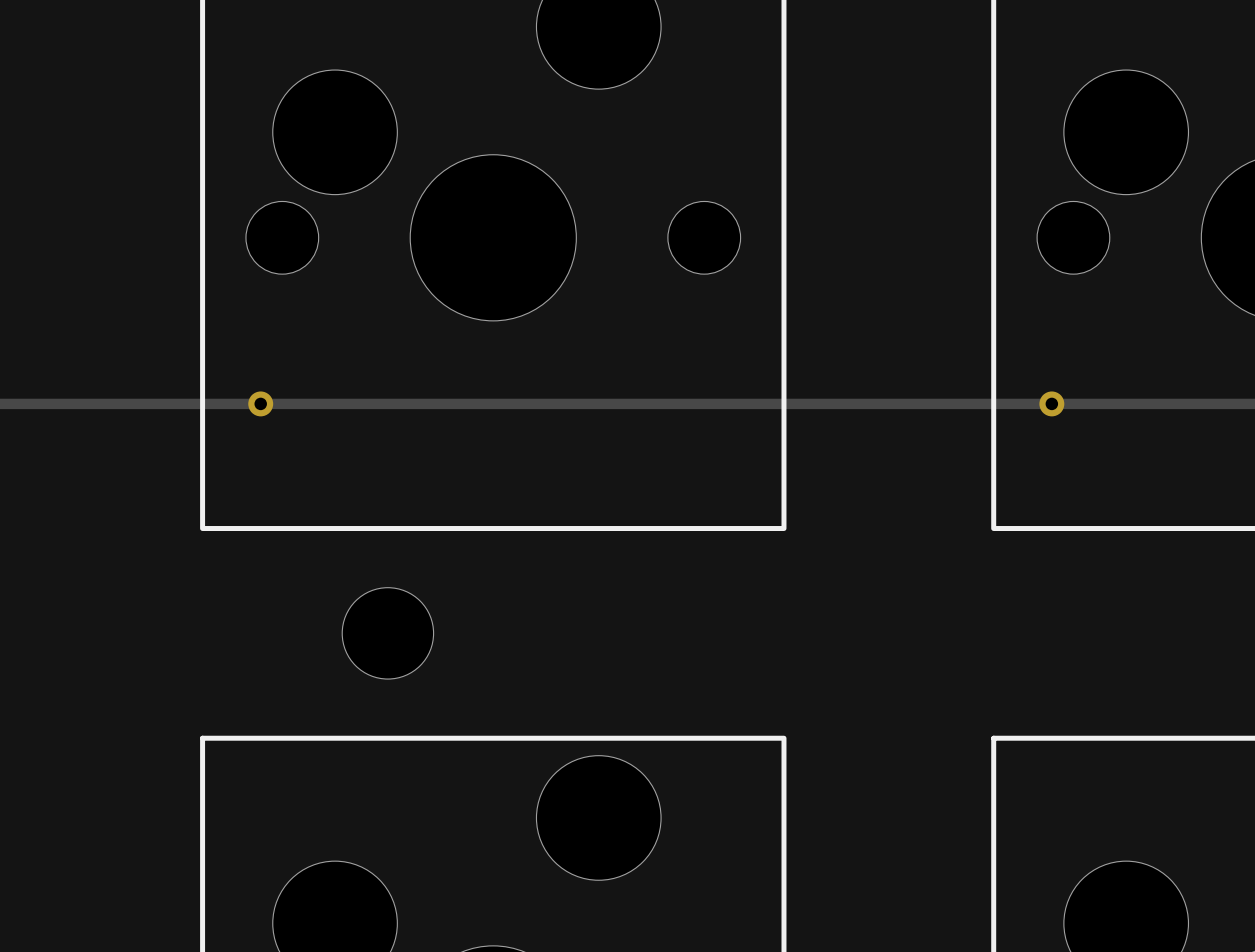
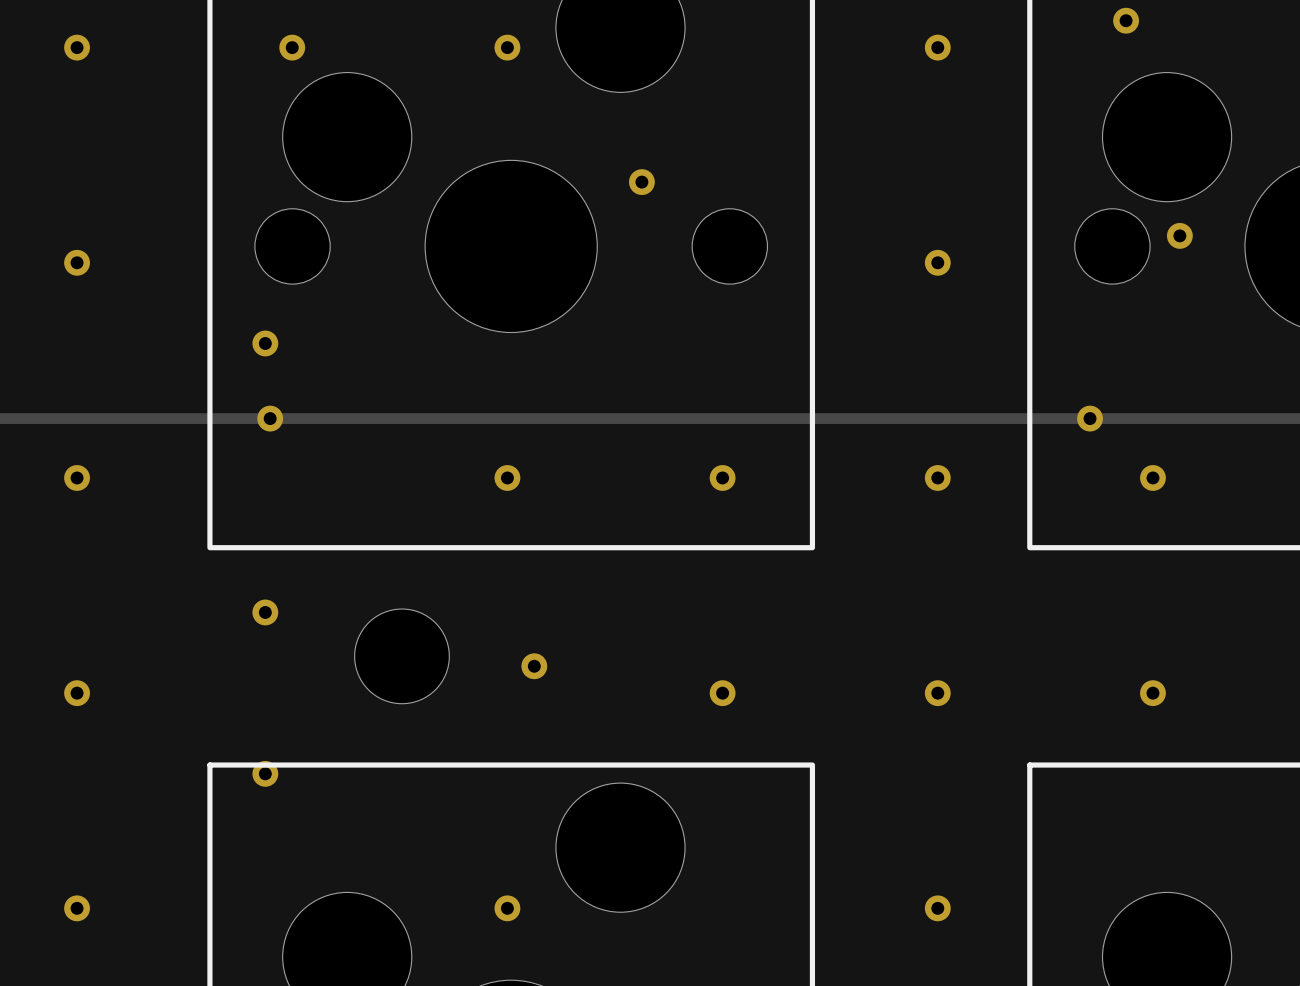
via: none -> (1126, 20)
via: none -> (77, 47)
via: none -> (292, 47)
via: none -> (507, 47)
via: none -> (937, 47)
via: none -> (641, 182)
via: none -> (1179, 235)
via: none -> (77, 262)
via: none -> (937, 262)
via: none -> (265, 343)
via: none -> (77, 477)
via: none -> (507, 477)
via: none -> (722, 477)
via: none -> (937, 477)
via: none -> (1152, 477)
via: none -> (265, 612)
via: none -> (534, 666)
via: none -> (77, 693)
via: none -> (722, 693)
via: none -> (937, 693)
via: none -> (1152, 693)
via: none -> (265, 773)
via: none -> (77, 908)
via: none -> (507, 908)
via: none -> (937, 908)

